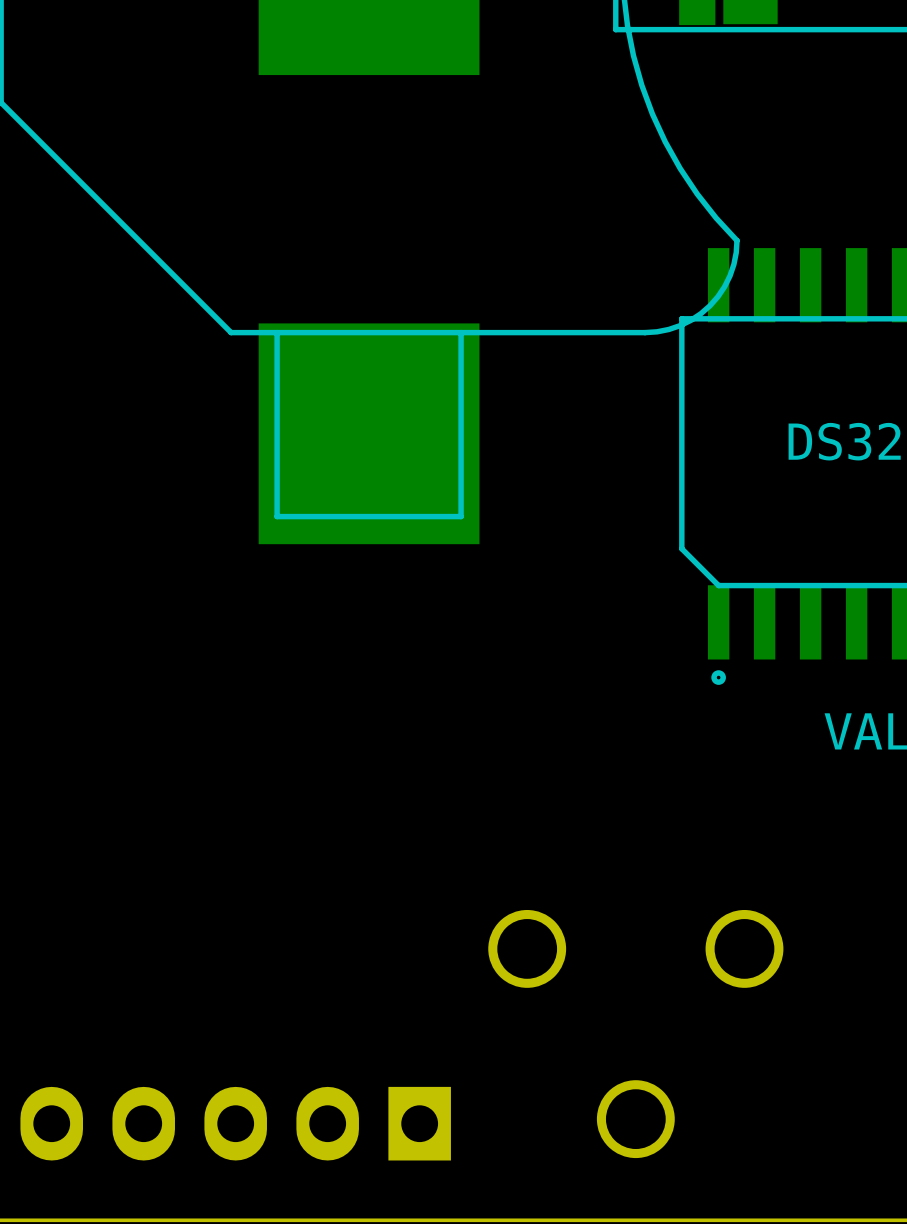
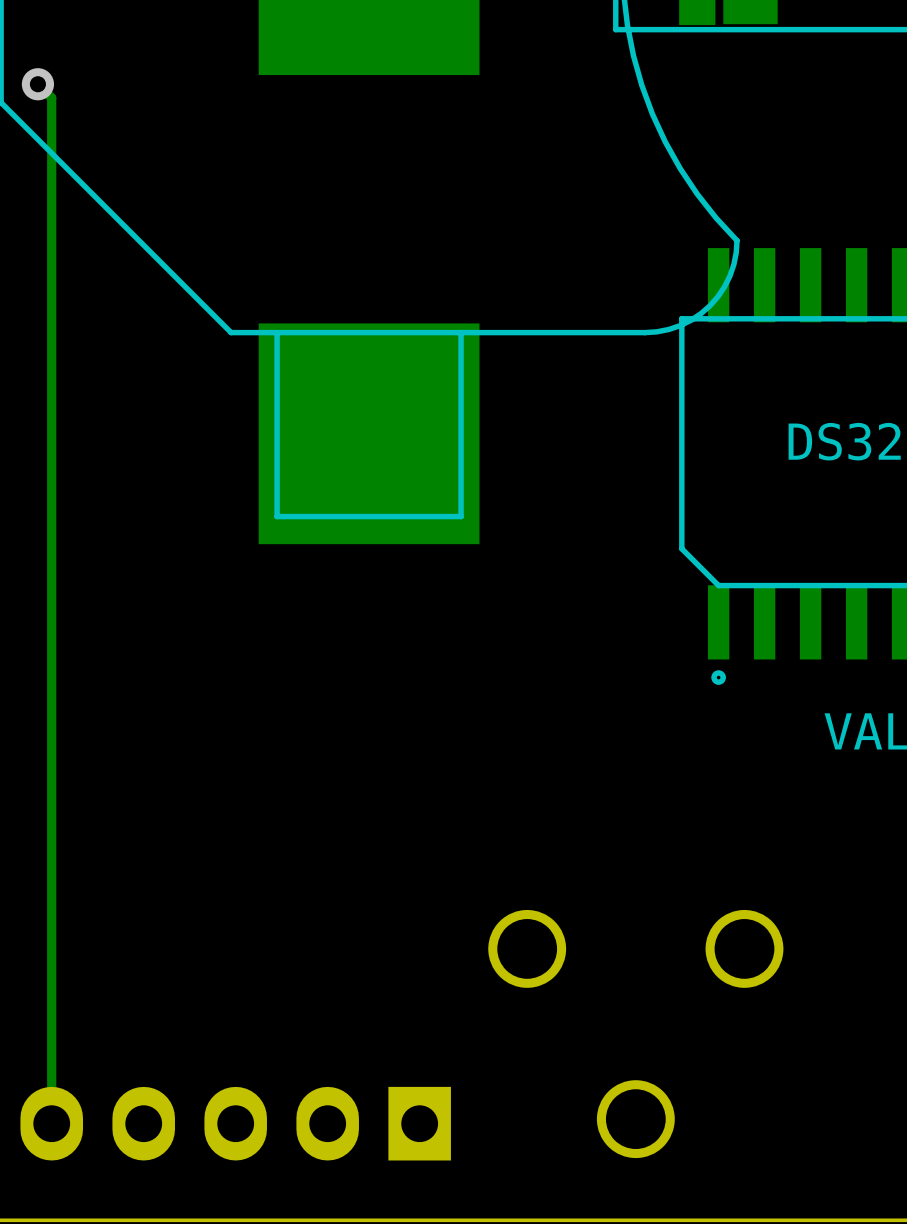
track: none -> (37, 84) (51, 98) (51, 1123)
via: none -> (37, 84)

